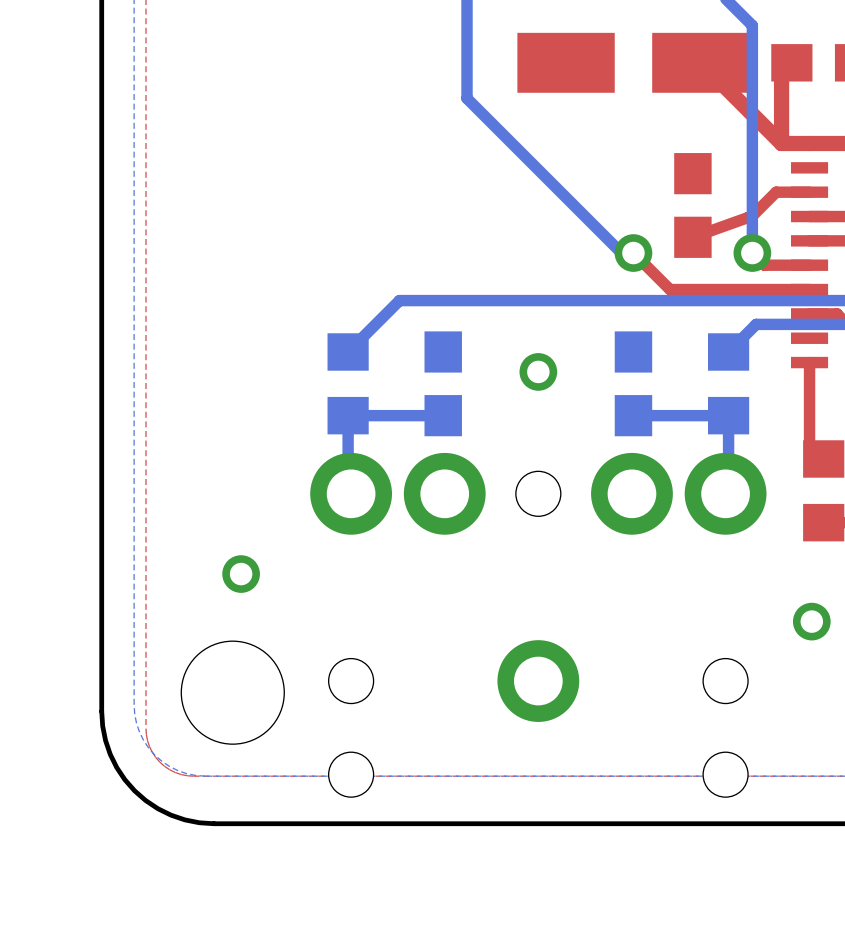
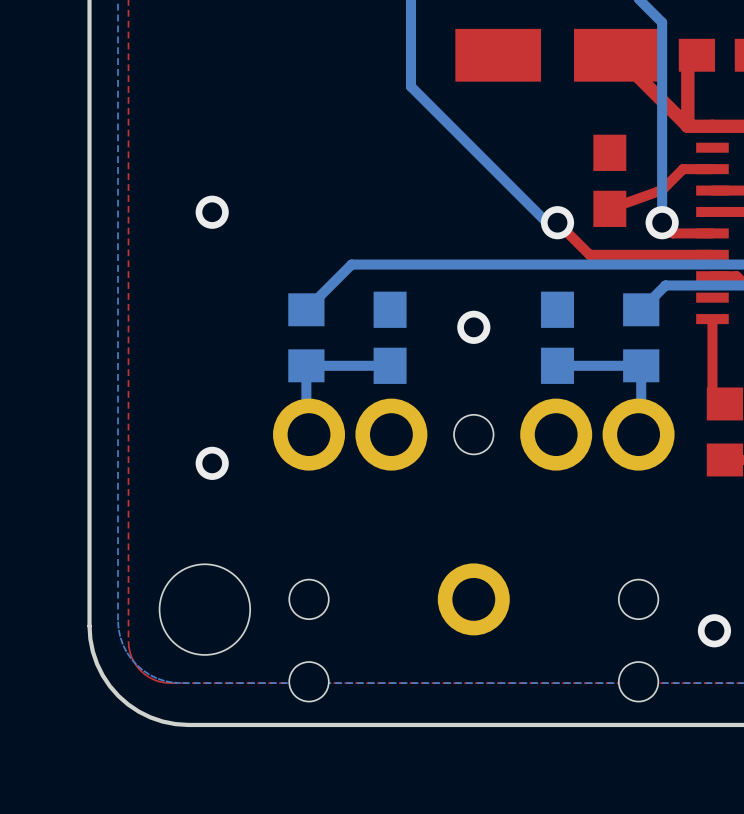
via: none -> (212, 212)
via position: (241, 574) -> (212, 463)
via position: (811, 621) -> (714, 630)

